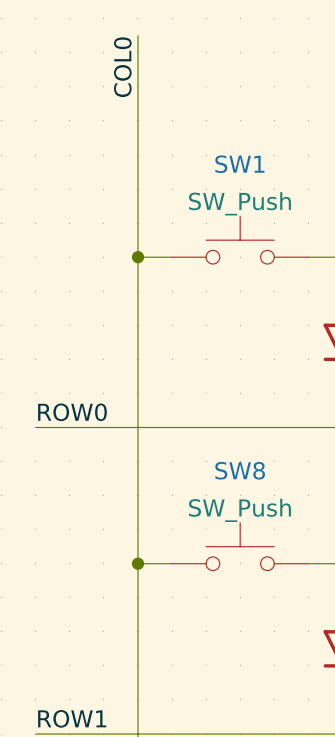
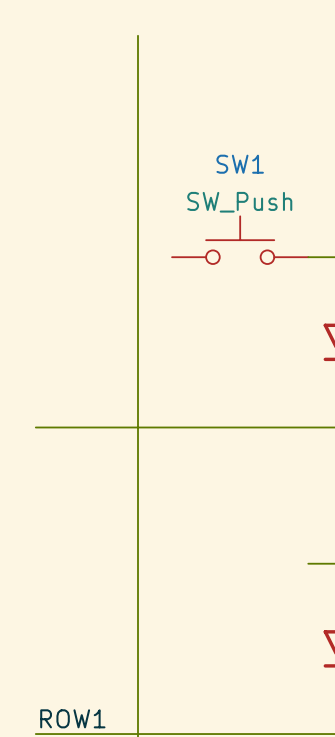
label: COL0 (122, 67) -> none
wire: (137, 257) (172, 257) -> none
junction: (137, 257) -> none
label: ROW0 (72, 412) -> none
SW8: SW_Push (240, 546) -> none
wire: (137, 563) (172, 563) -> none
junction: (137, 563) -> none

